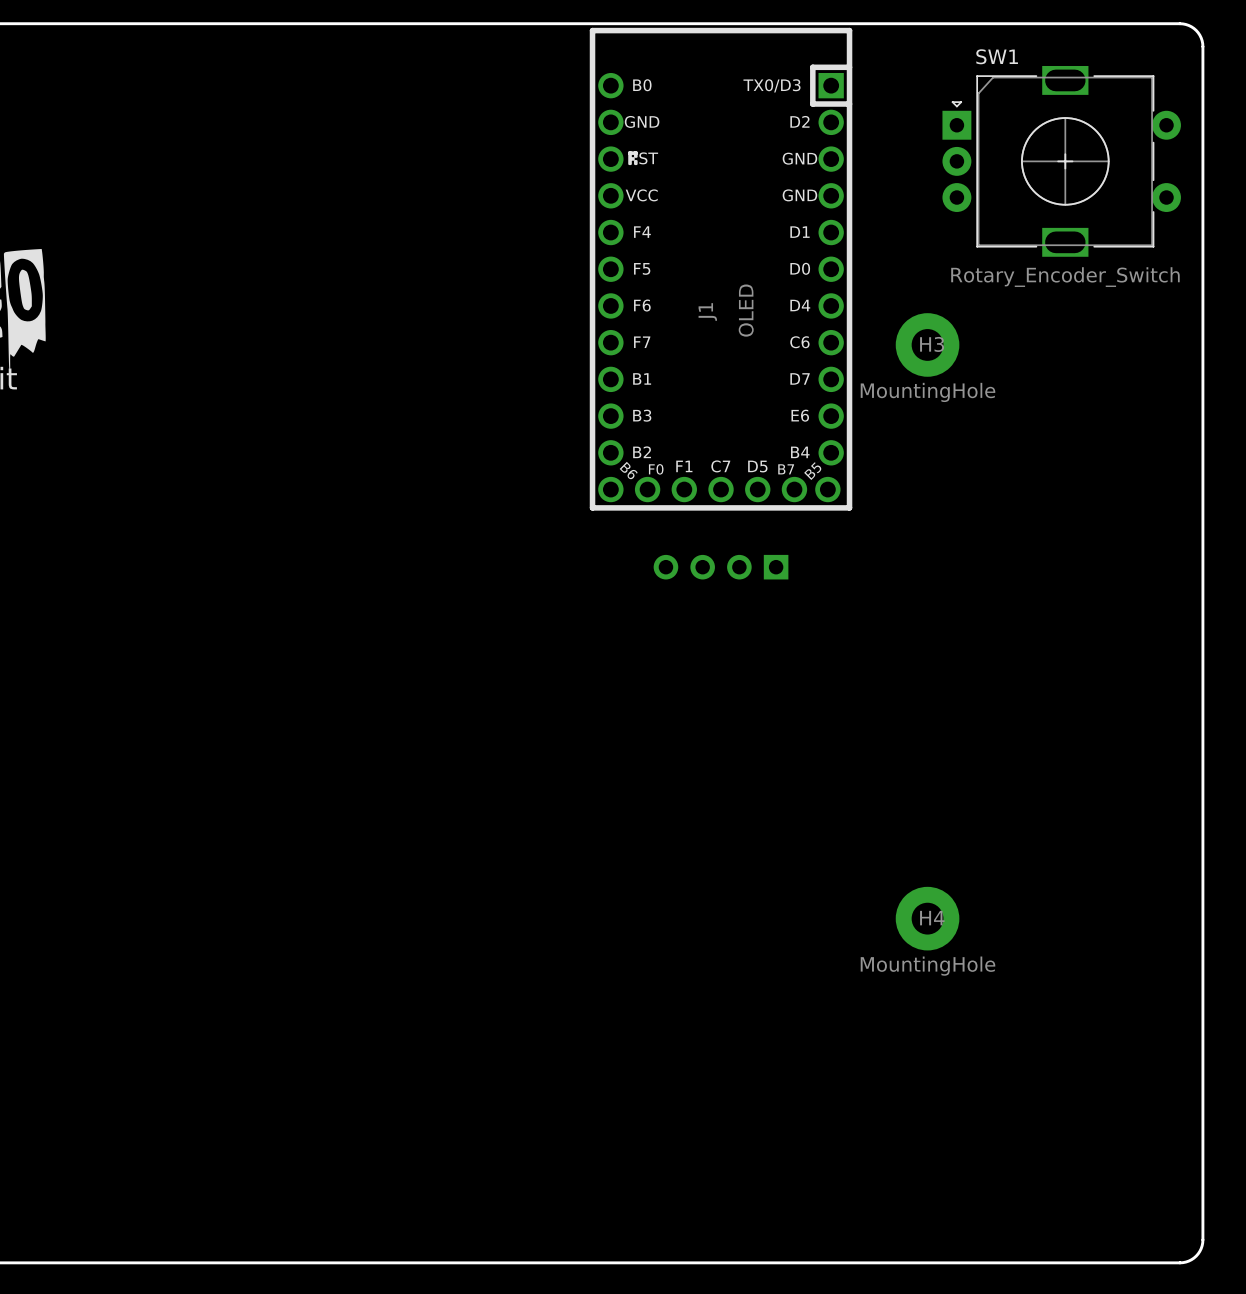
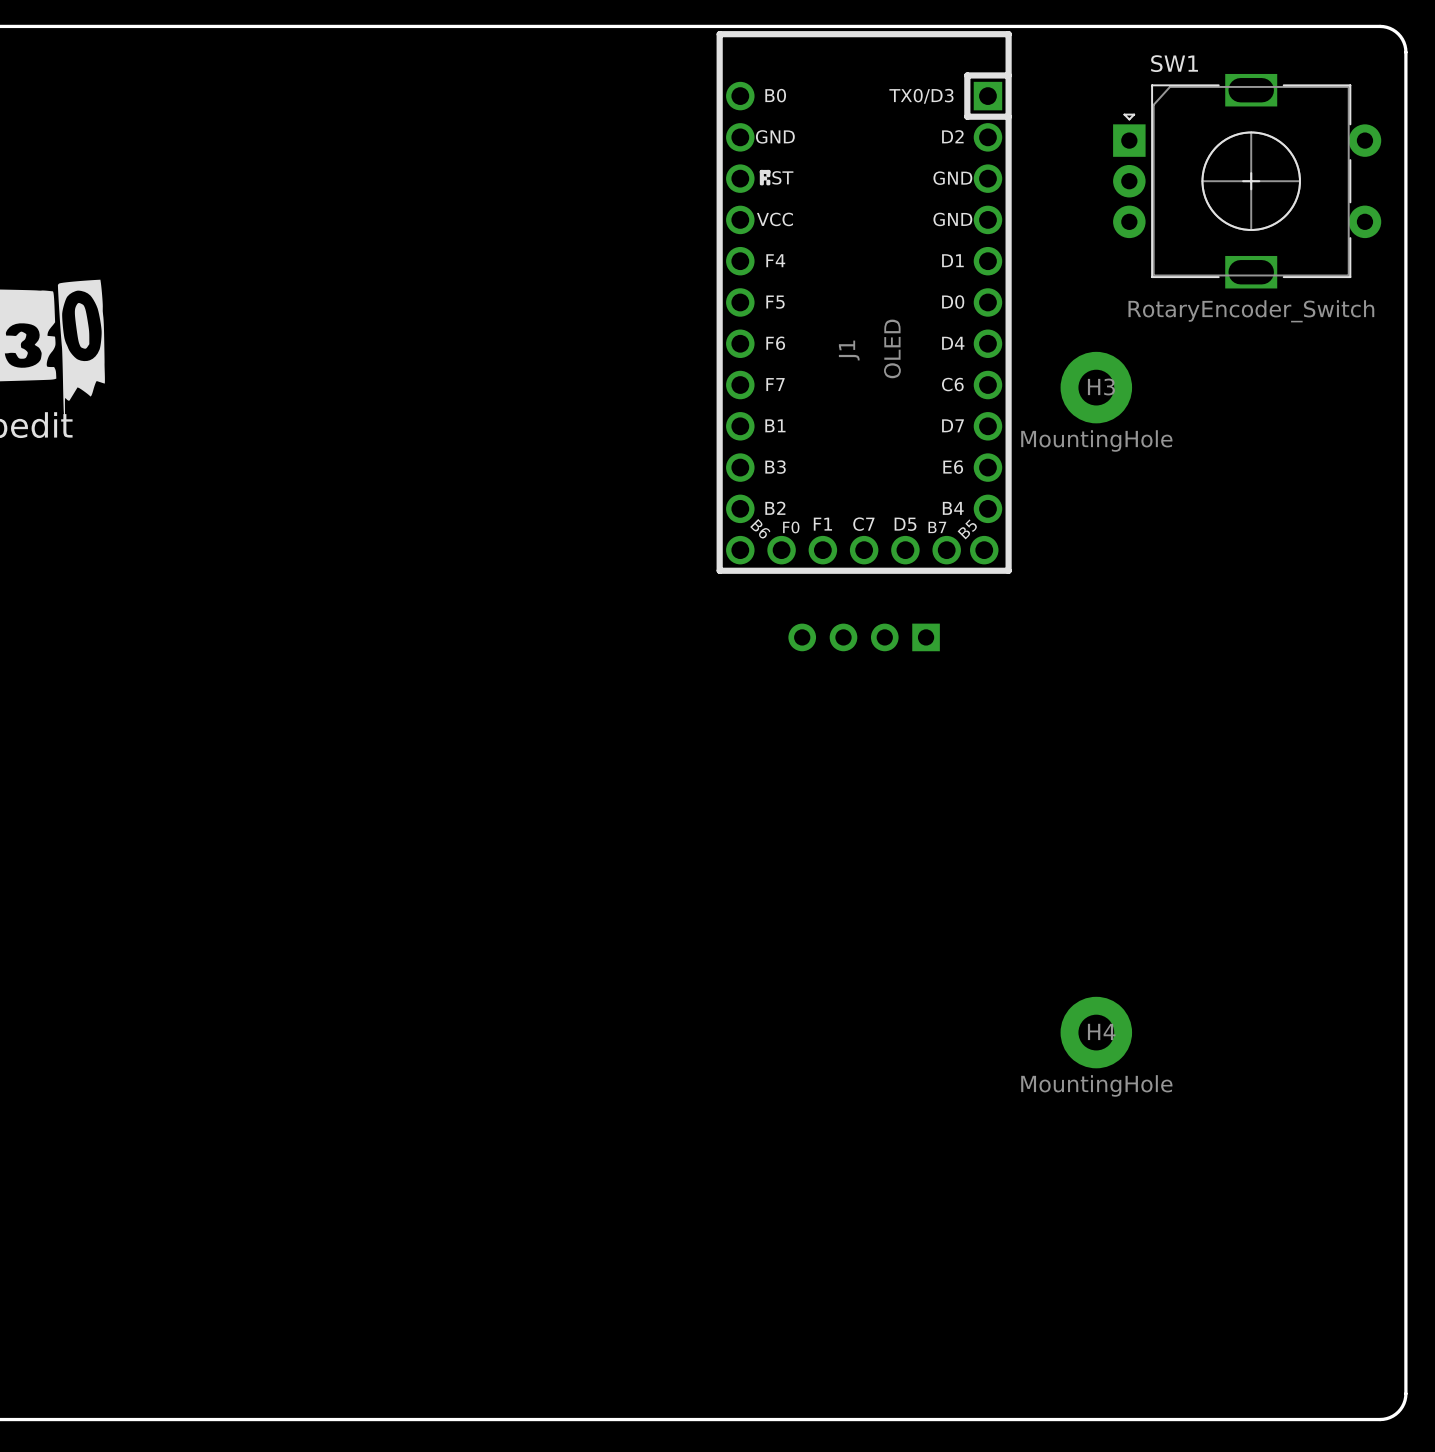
SW1 value: Rotary_Encoder_Switch (1065, 277) -> RotaryEncoder_Switch (1251, 311)

